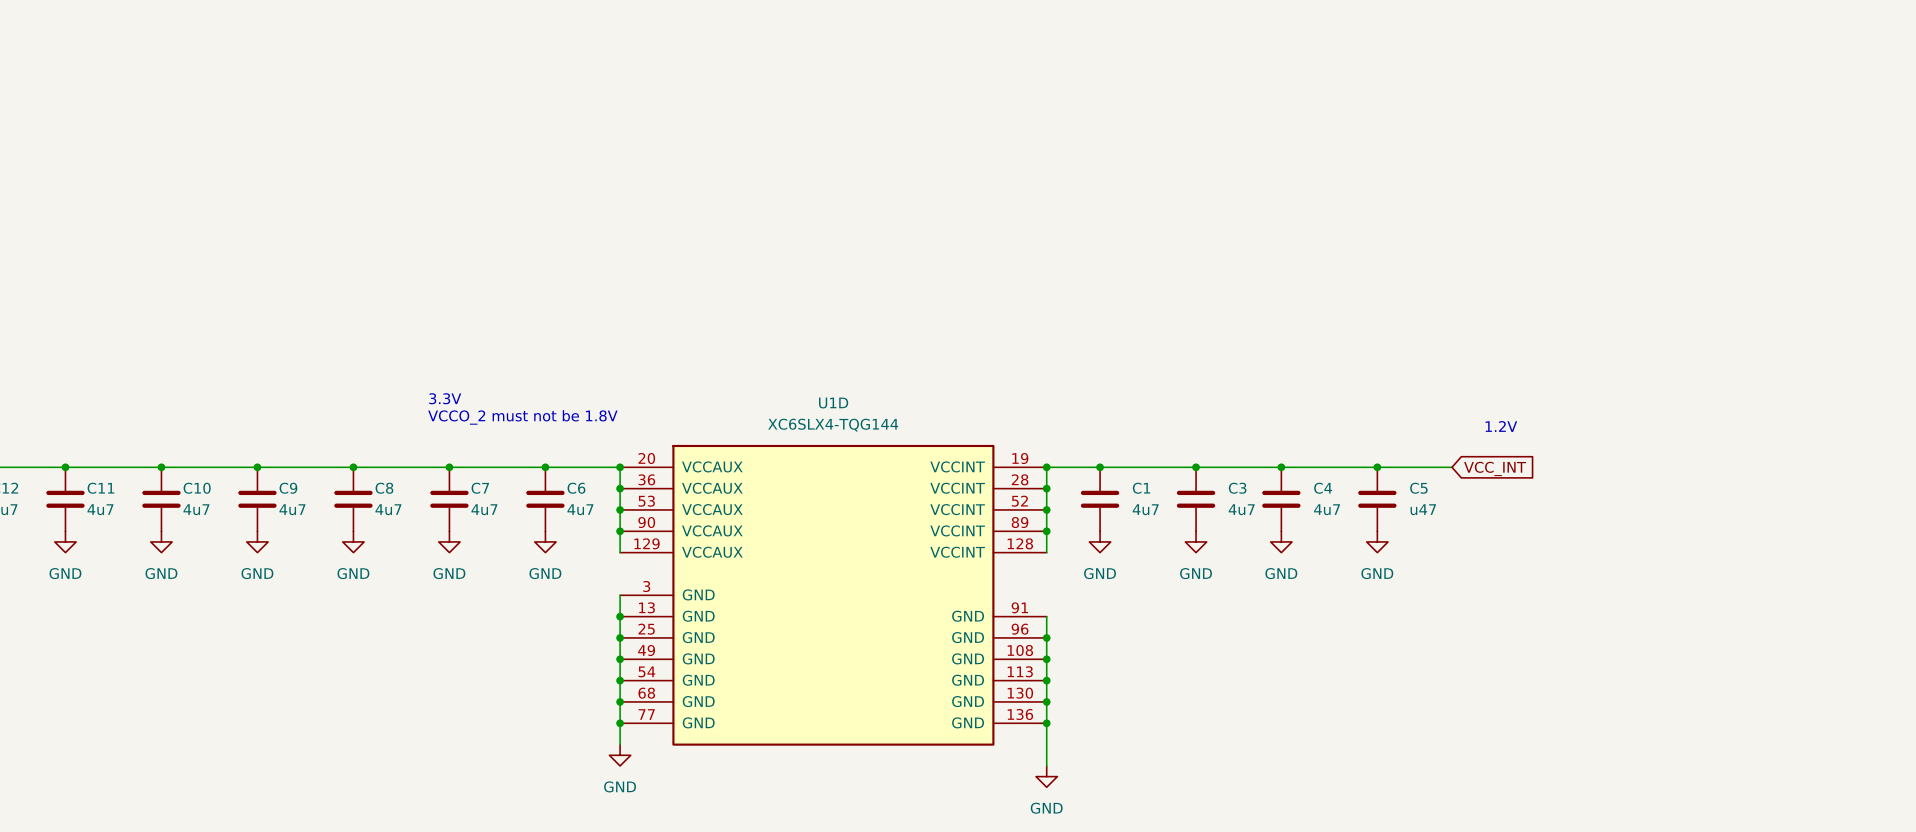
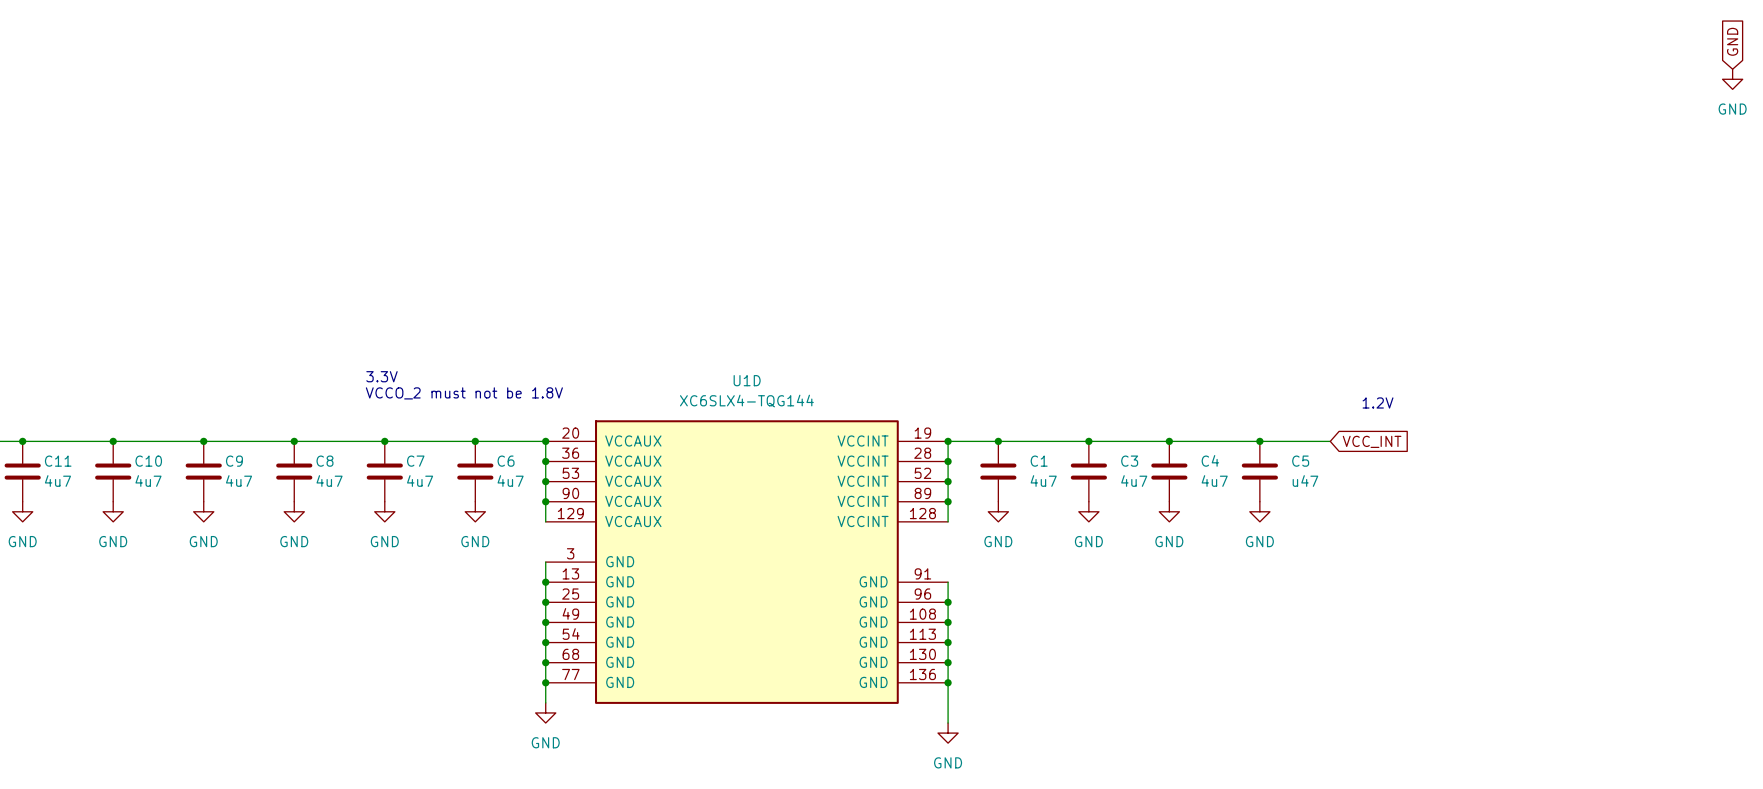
global label: none -> GND (1732, 41)
power symbol: none -> GND (1732, 79)

